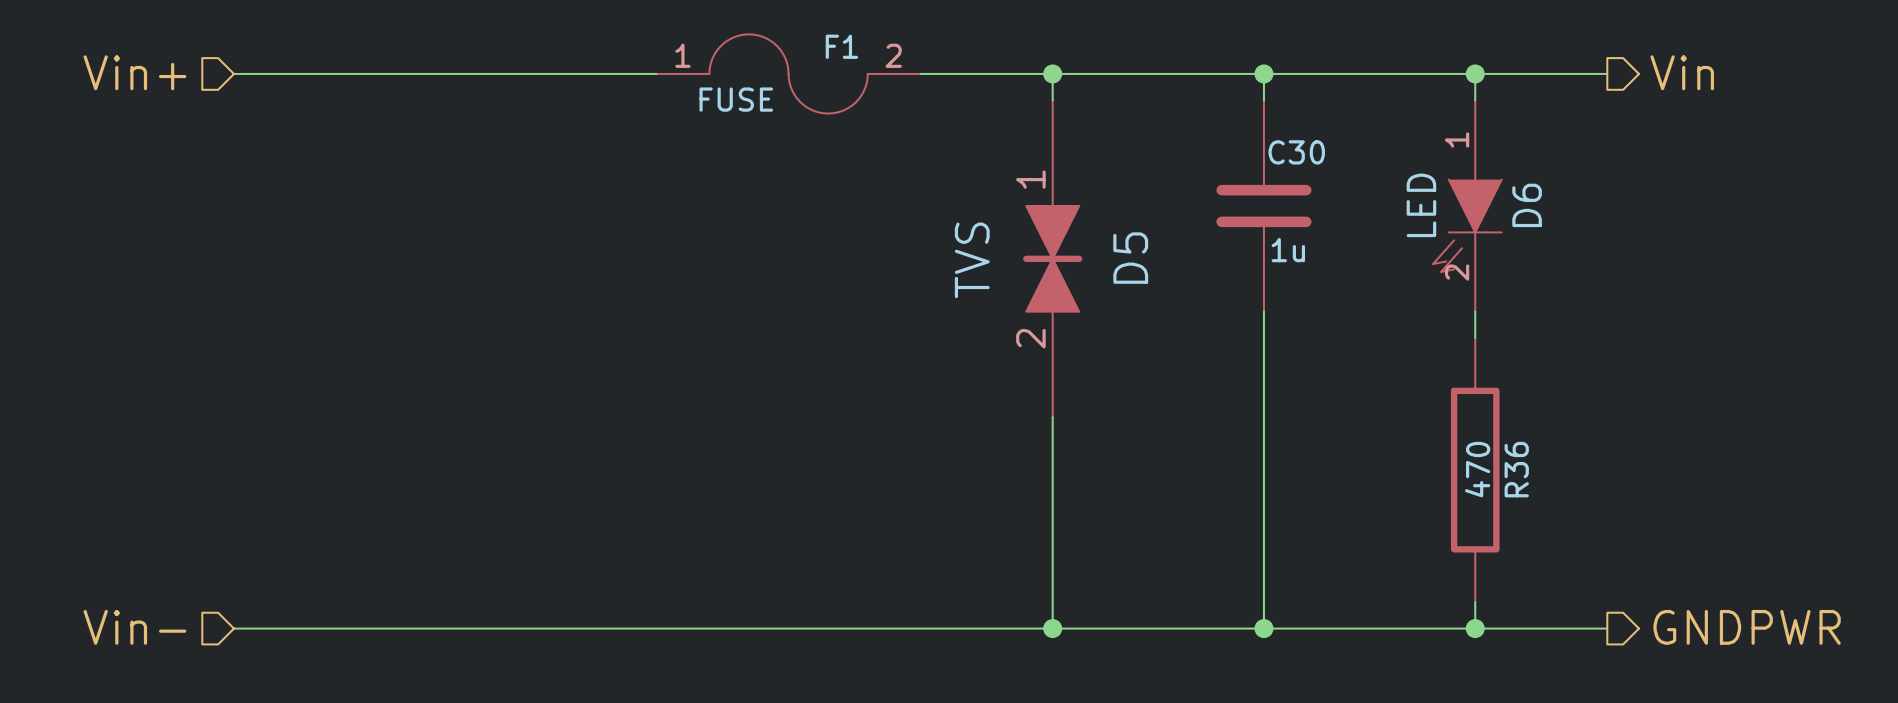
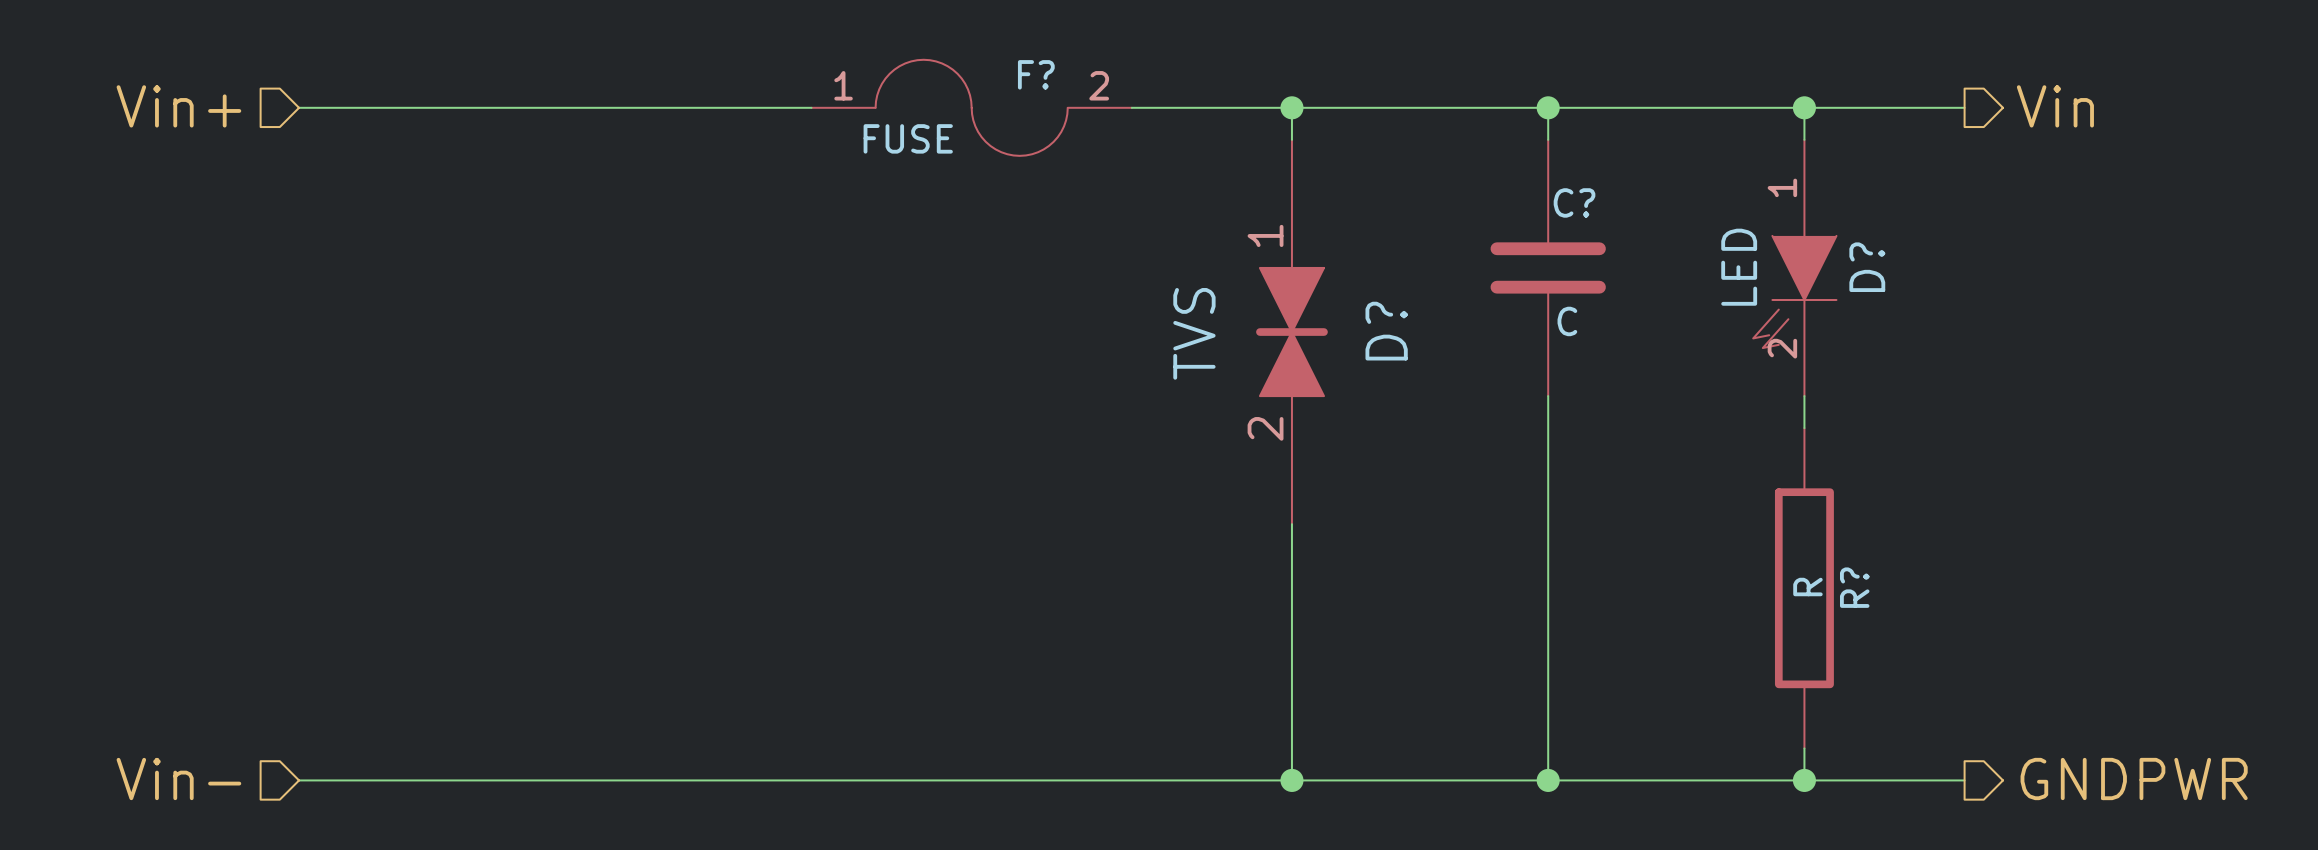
F1 name: F1 (841, 46) -> F? (1036, 74)
C30 name: C30 (1296, 152) -> C? (1574, 202)
D6 name: D6 (1527, 205) -> D? (1867, 267)
C30 value: 1u (1288, 250) -> C (1567, 321)
D5 name: D5 (1130, 258) -> D? (1386, 331)
R36 value: 470 (1477, 469) -> R (1807, 587)
R36 name: R36 (1516, 469) -> R? (1854, 587)

